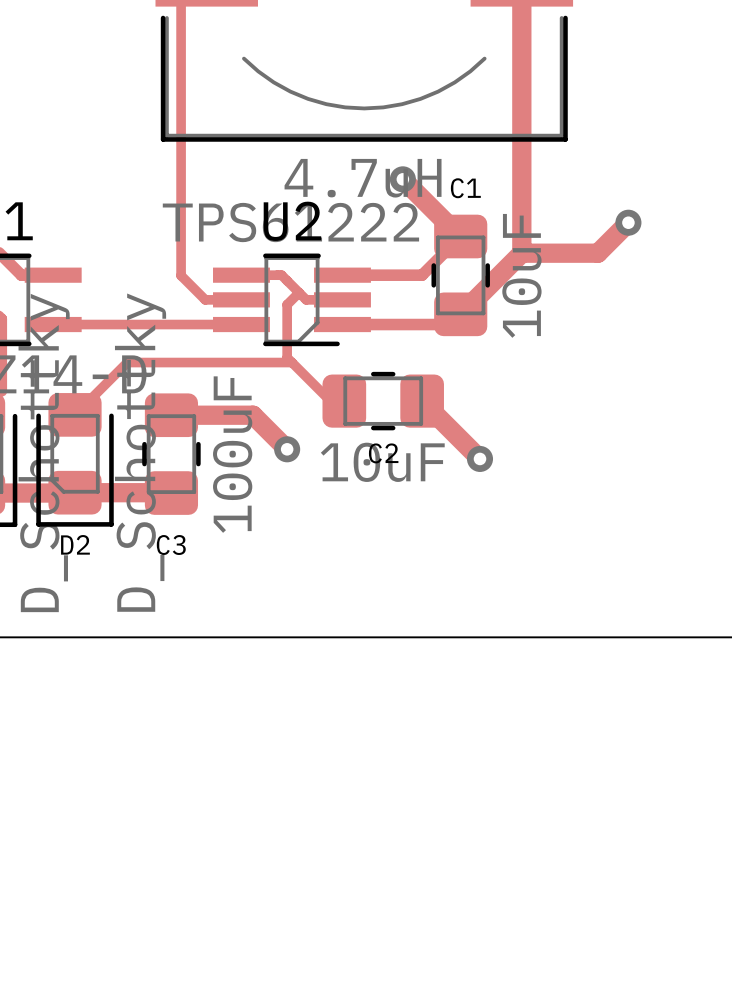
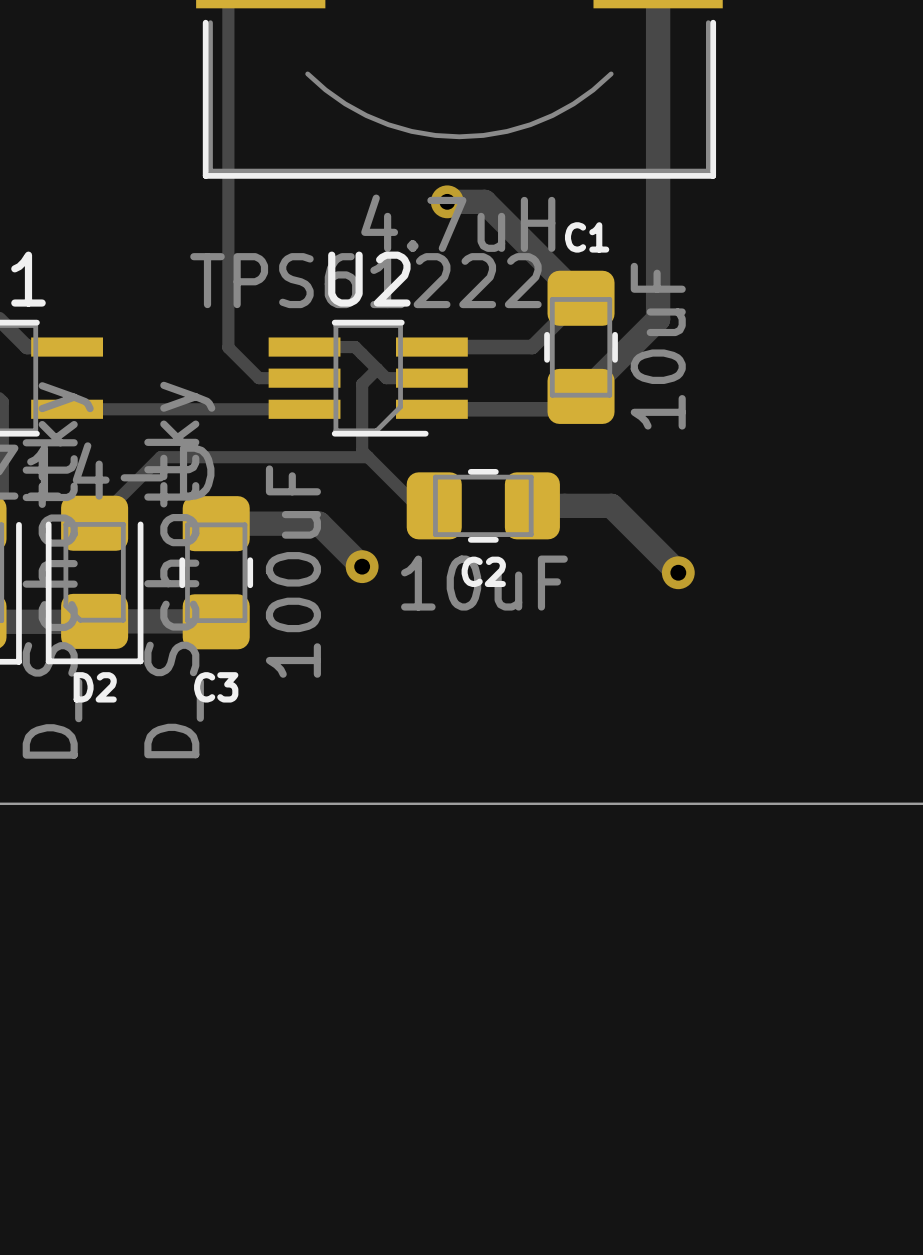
track: (402, 179) (460, 236) -> (447, 201) (484, 201) (581, 298)
via position: (402, 179) -> (447, 201)
track: (628, 222) (597, 253) (521, 253) -> none
via: (628, 222) -> none
track: (422, 401) (480, 458) -> (532, 505) (611, 505) (678, 572)
via position: (480, 458) -> (678, 572)

